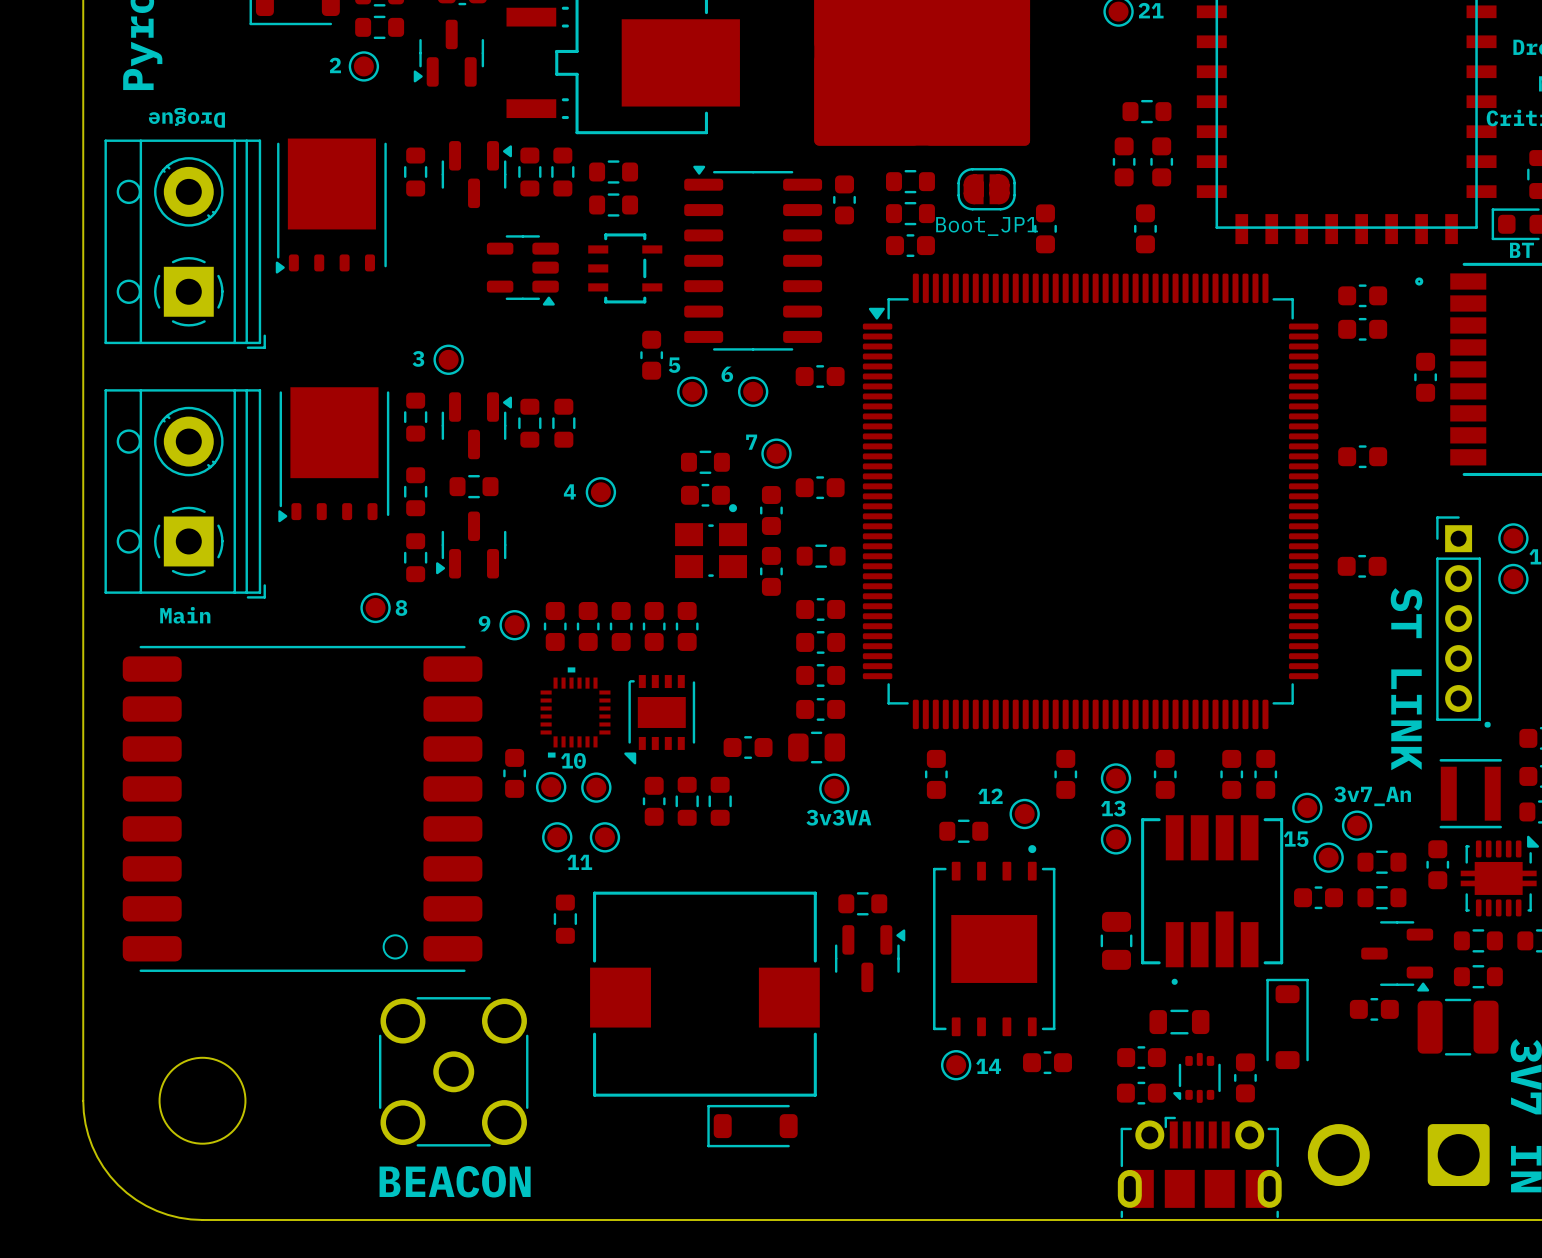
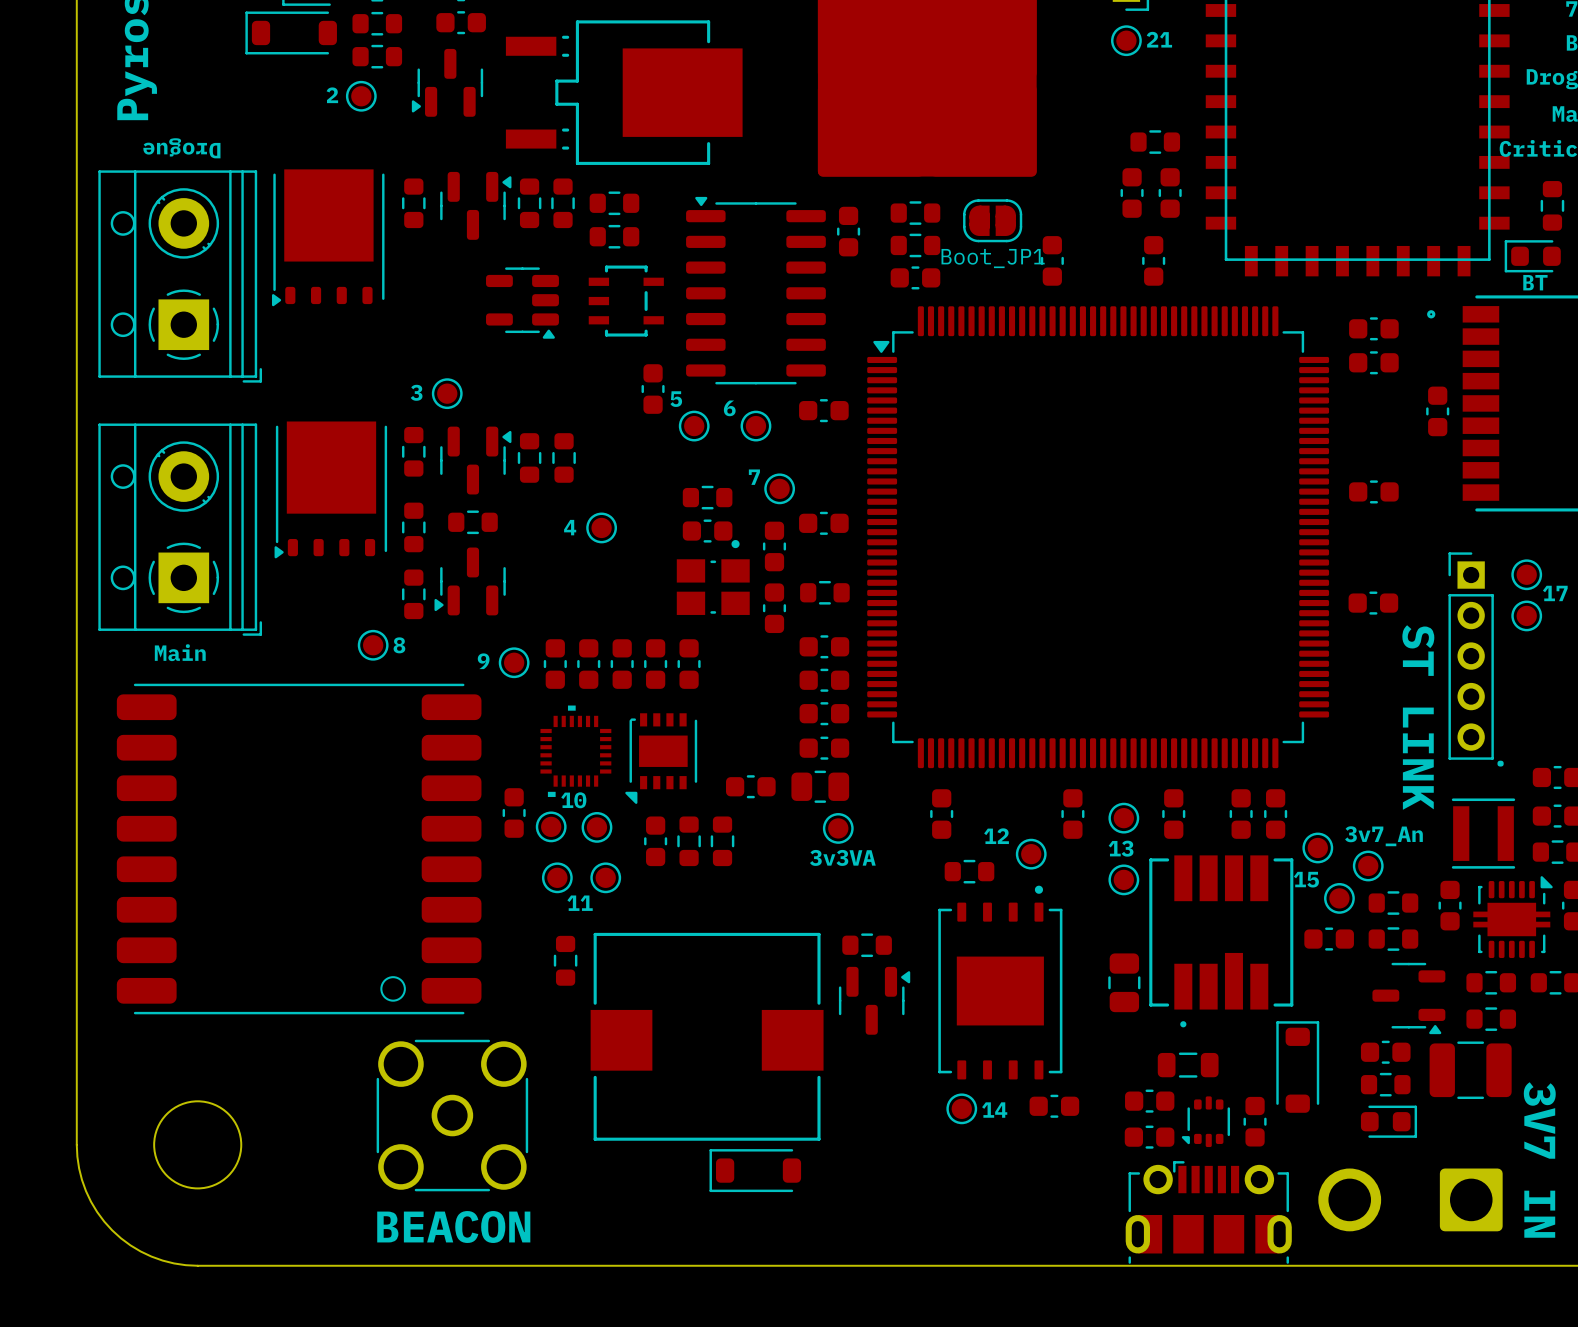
part: none -> (1385, 1084)
part: none -> (1388, 1121)

